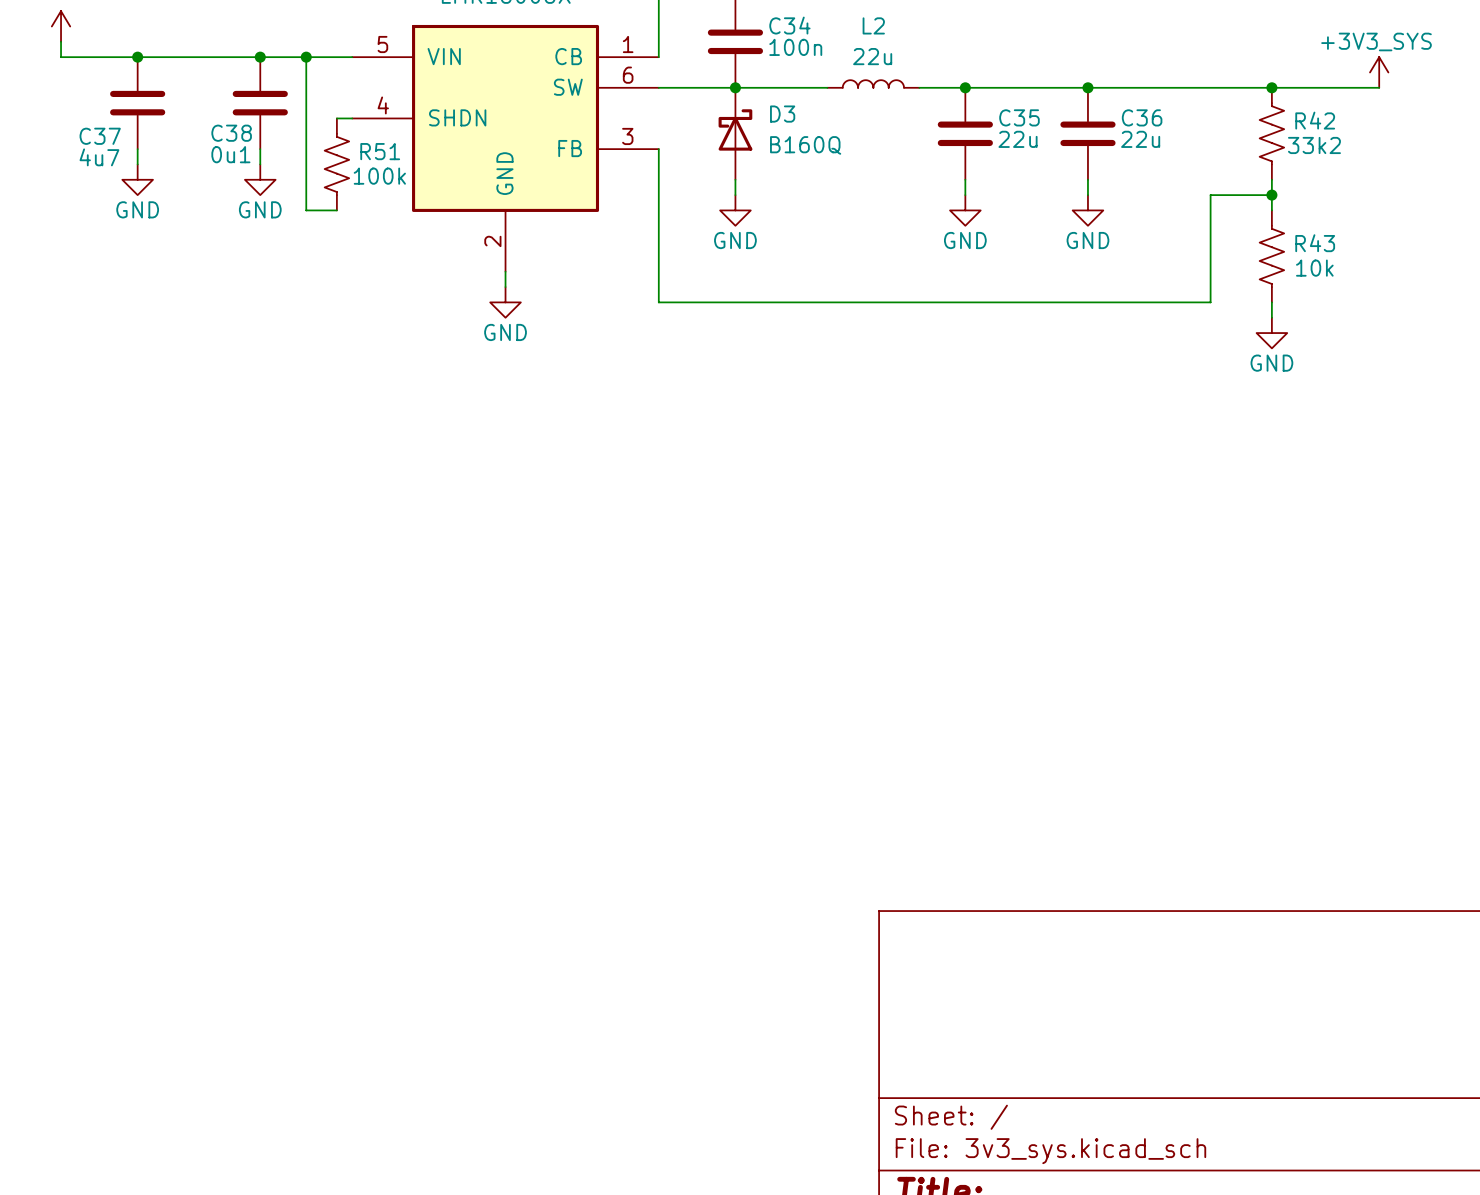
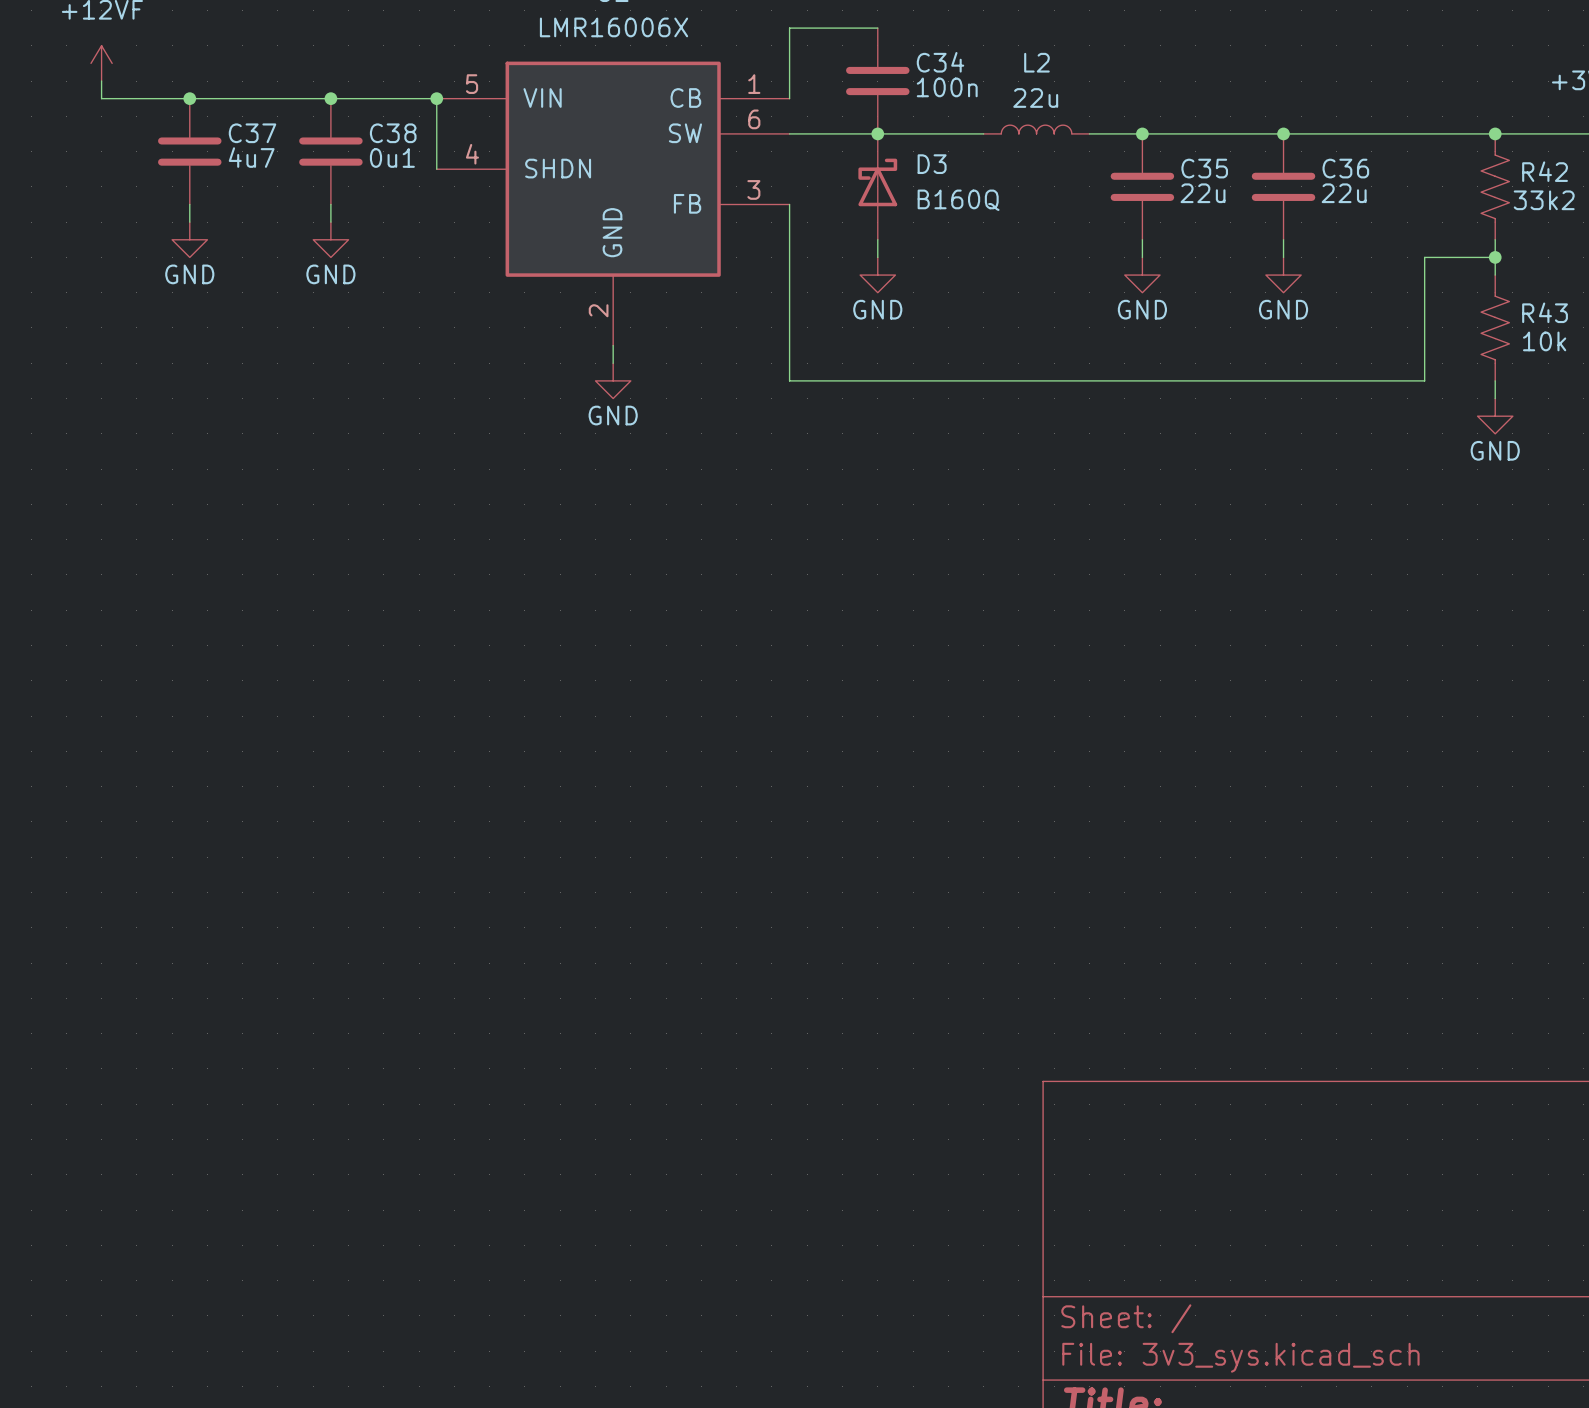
wire: (306, 57) (306, 210) (336, 210) -> none
junction position: (306, 57) -> (436, 98)
wire: (336, 118) (352, 118) -> (436, 98) (436, 169)
C38 name position: C38 (231, 133) -> C38 (393, 133)
C37 name position: C37 (100, 136) -> C37 (252, 133)
C38 value position: 0u1 (230, 154) -> 0u1 (392, 157)
C37 value position: 4u7 (99, 157) -> 4u7 (251, 157)
R51: 100k (336, 164) -> none

